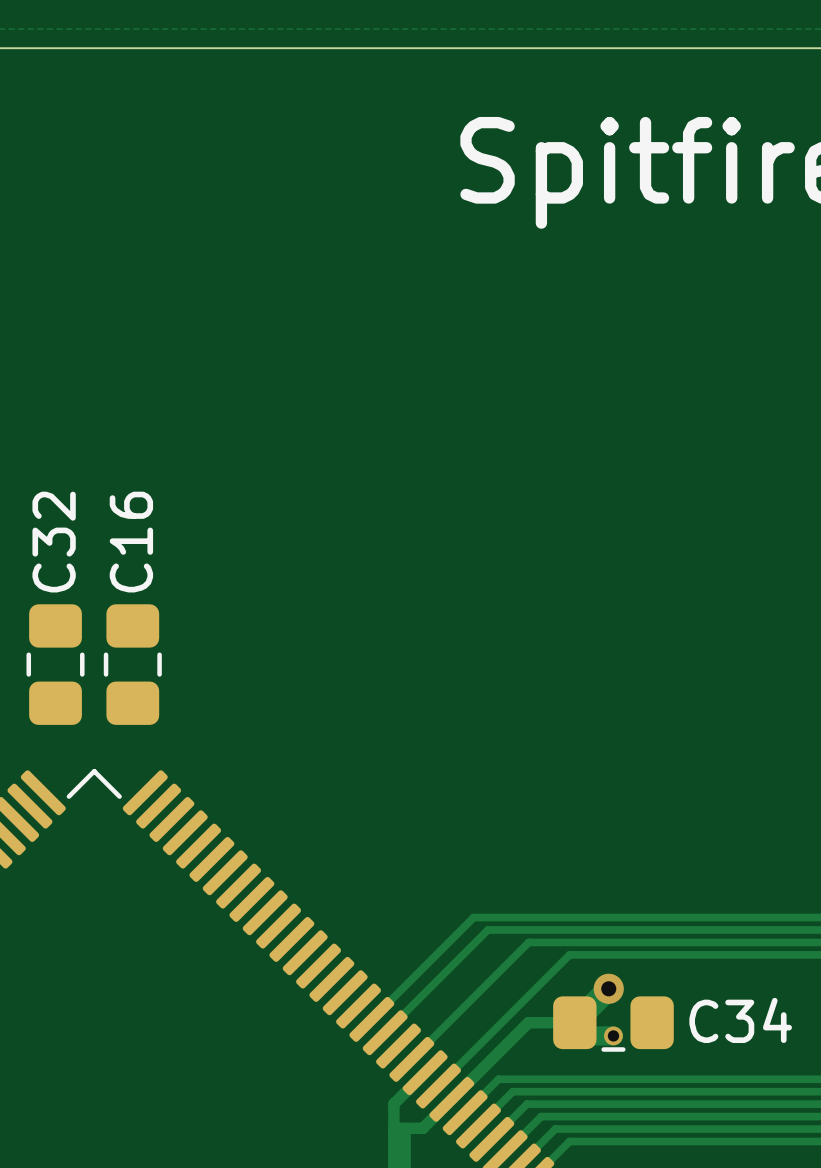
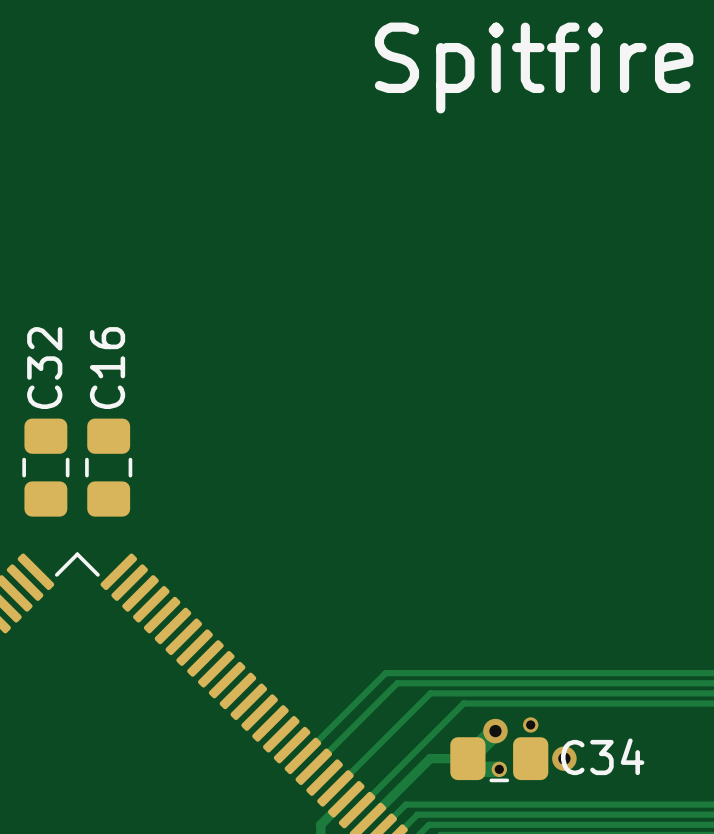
via: none -> (530, 724)
via: none -> (564, 758)

